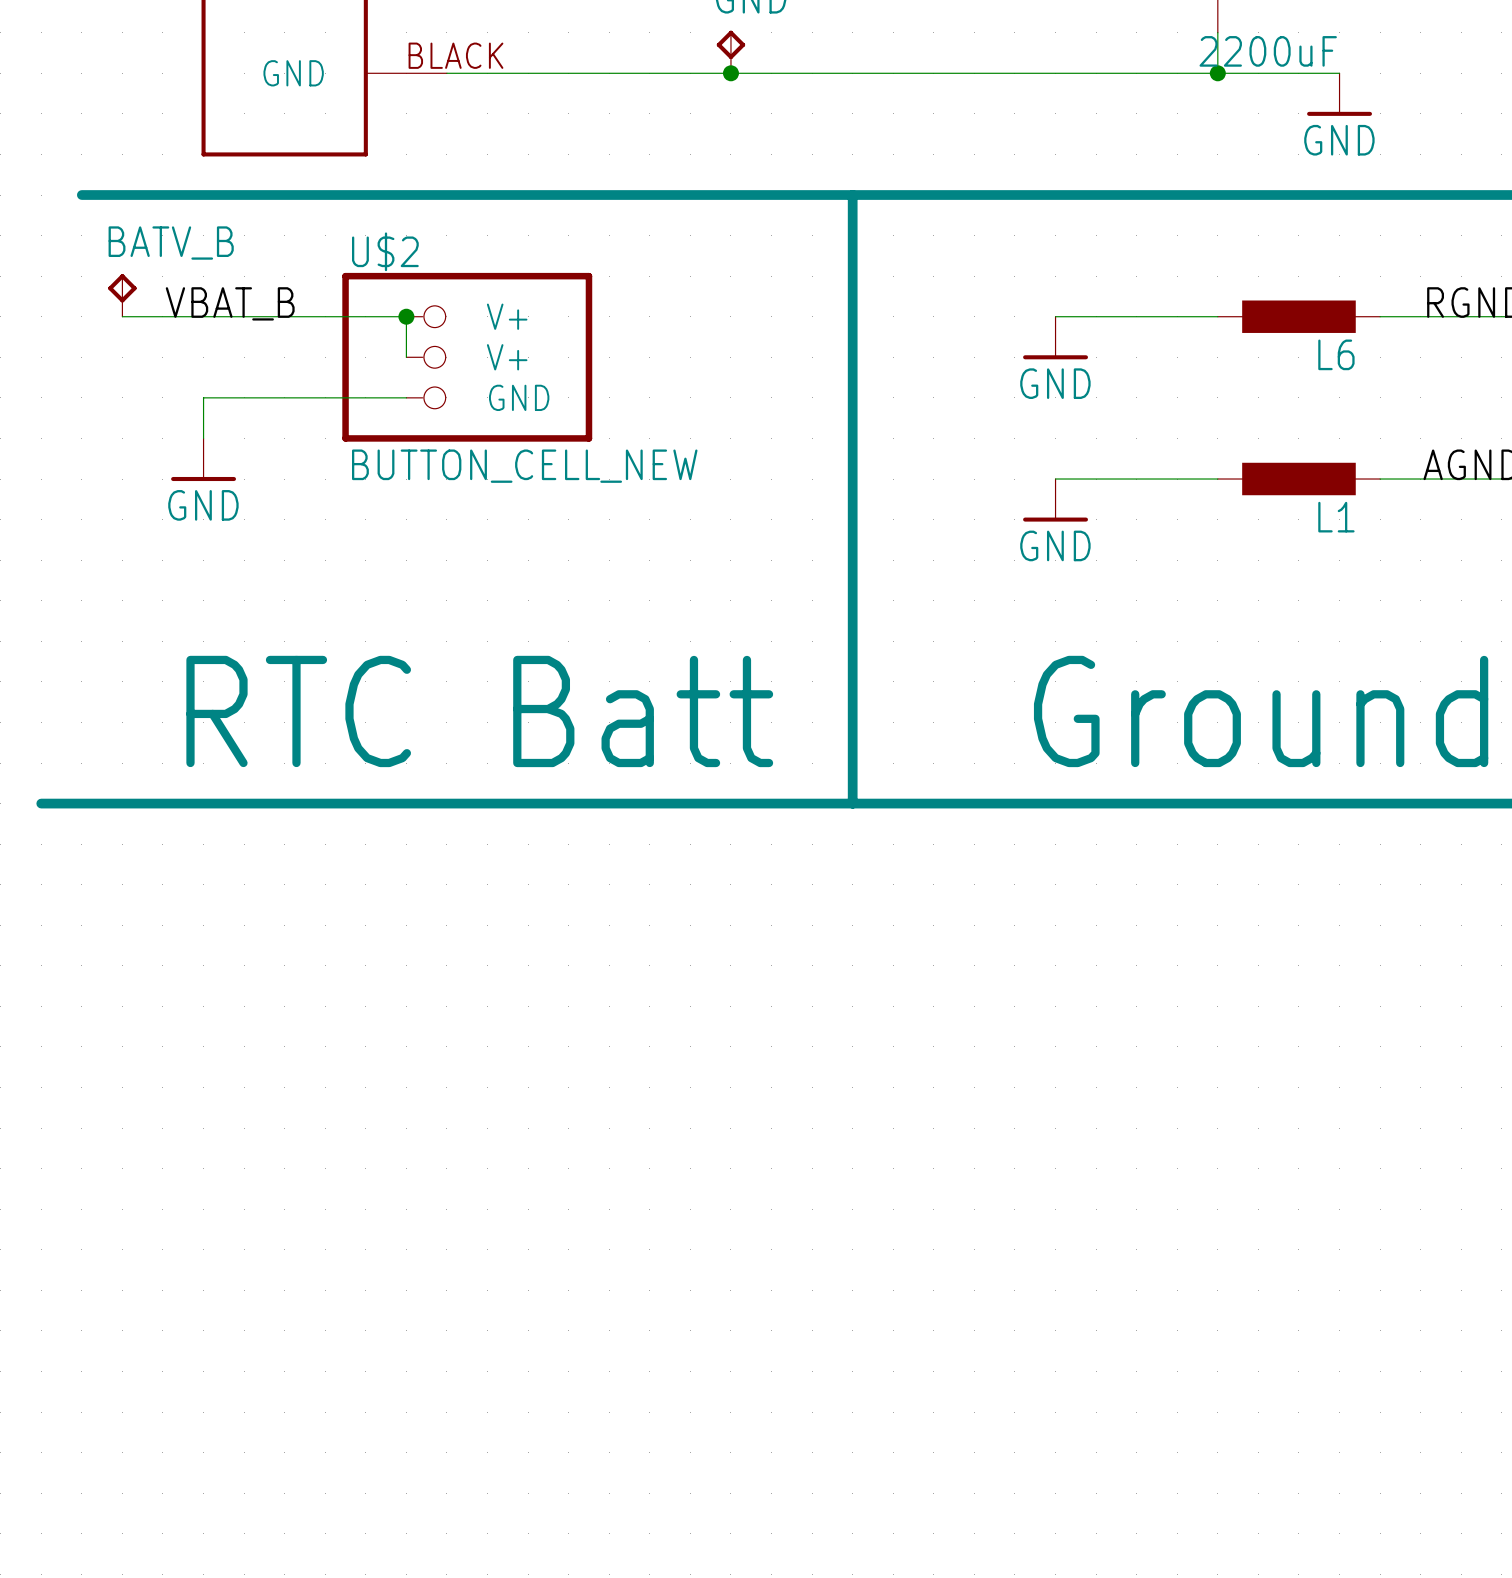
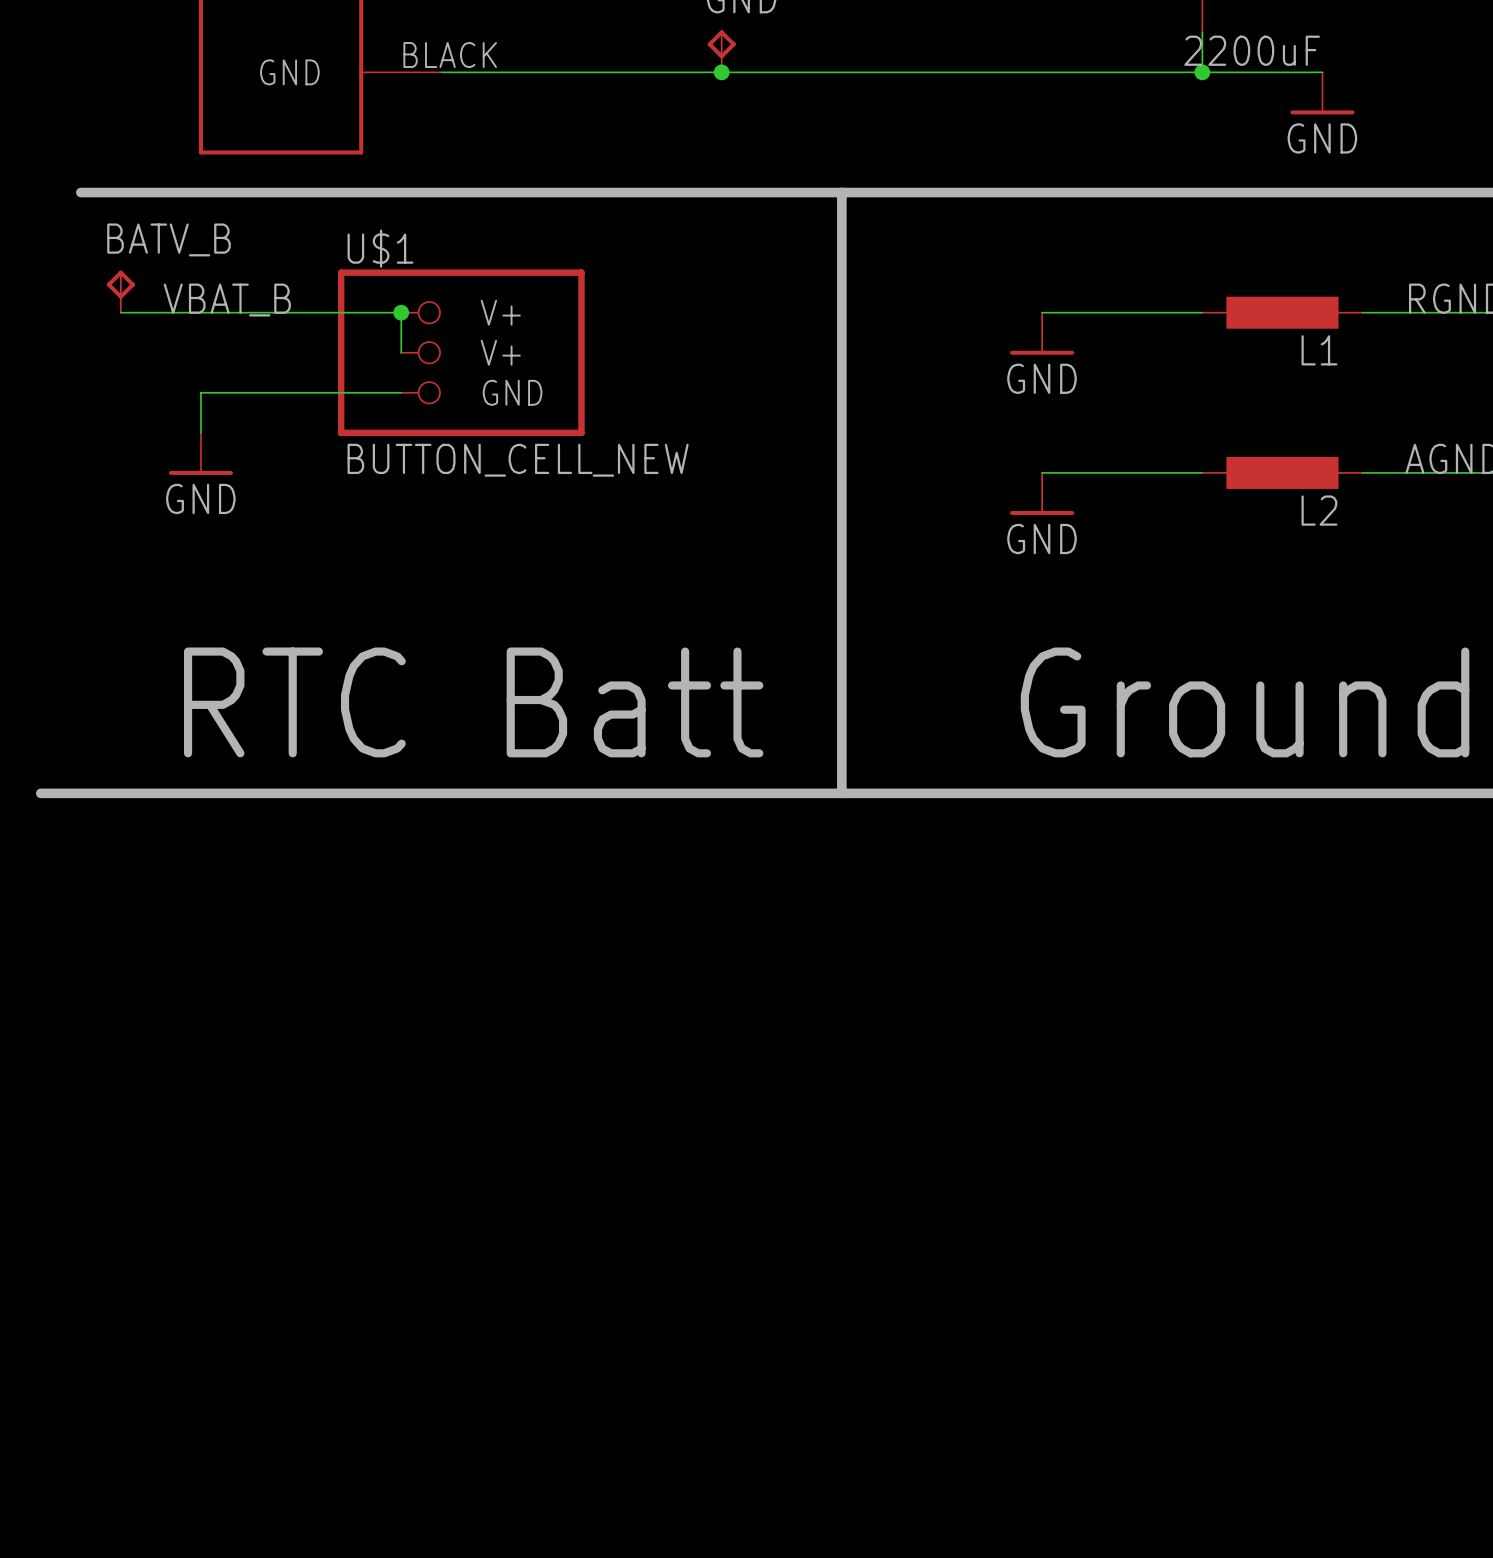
U$2 name: U$2 (385, 251) -> U$1 (380, 248)
L6 name: L6 (1336, 354) -> L1 (1319, 350)
L1 name: L1 (1336, 517) -> L2 (1319, 510)

